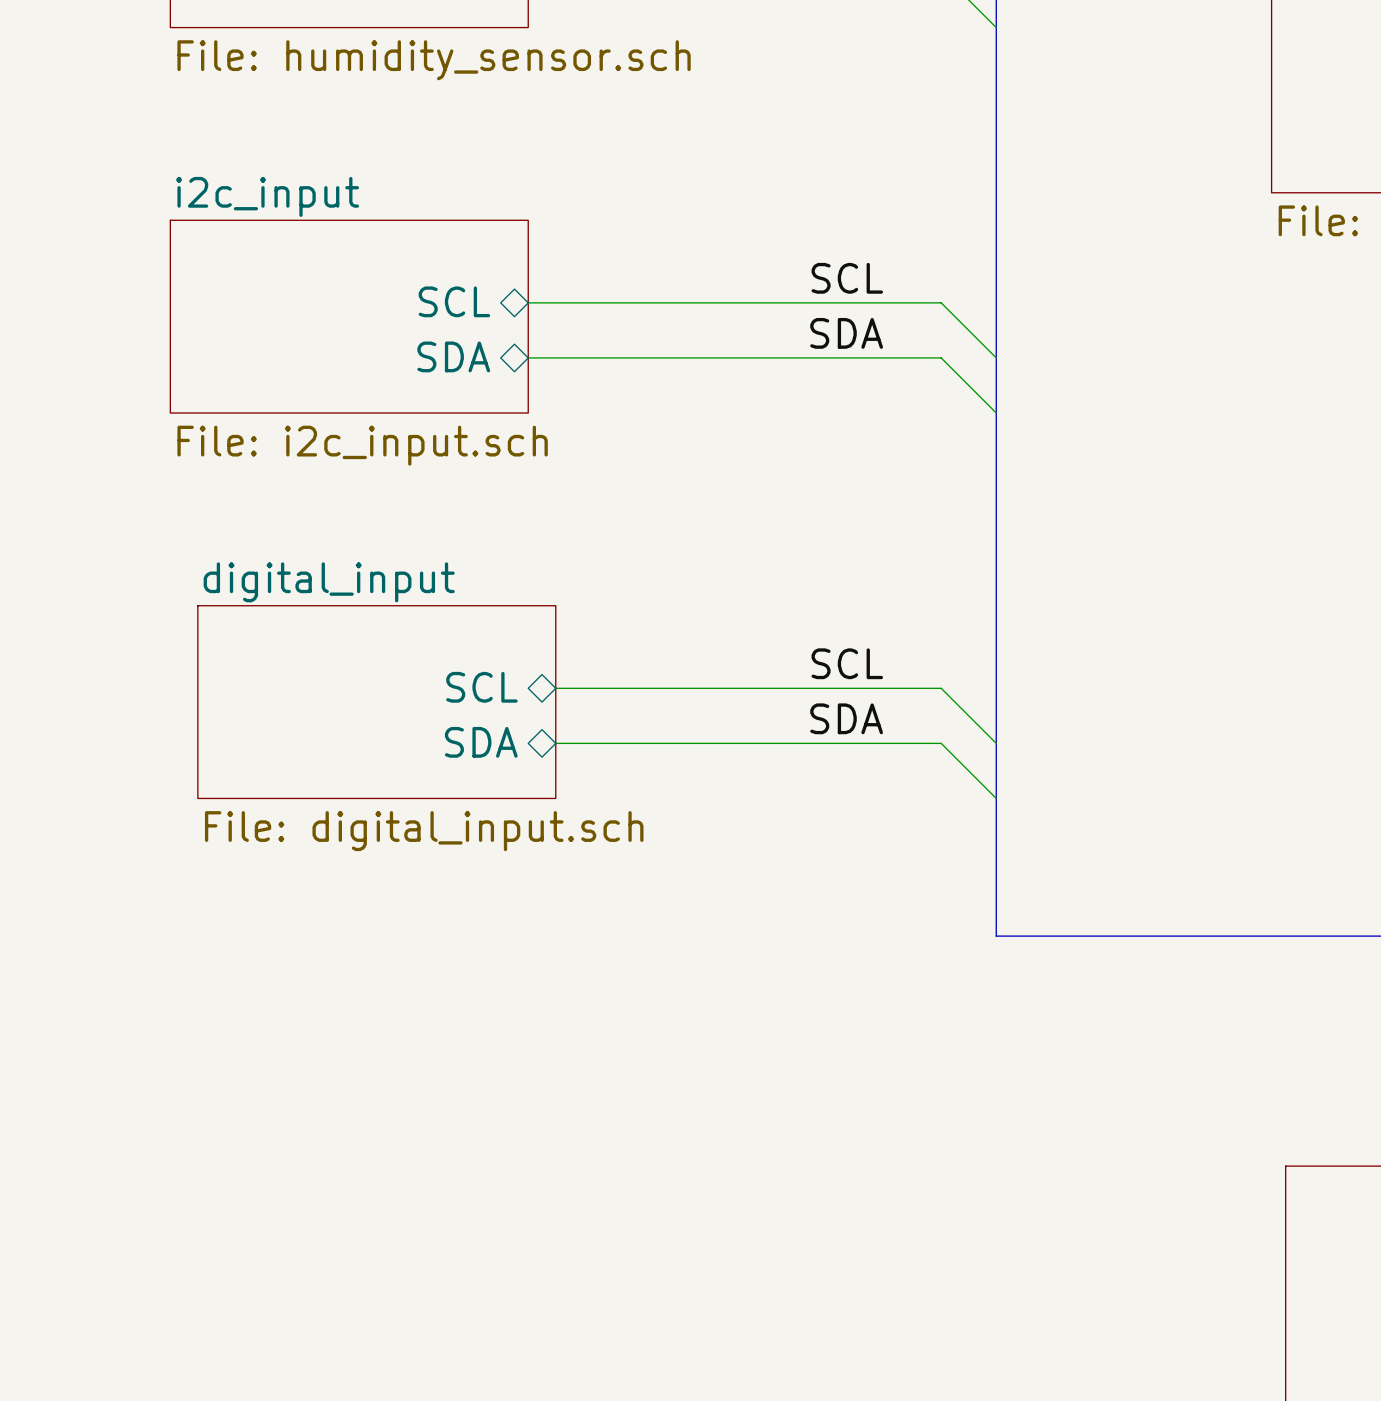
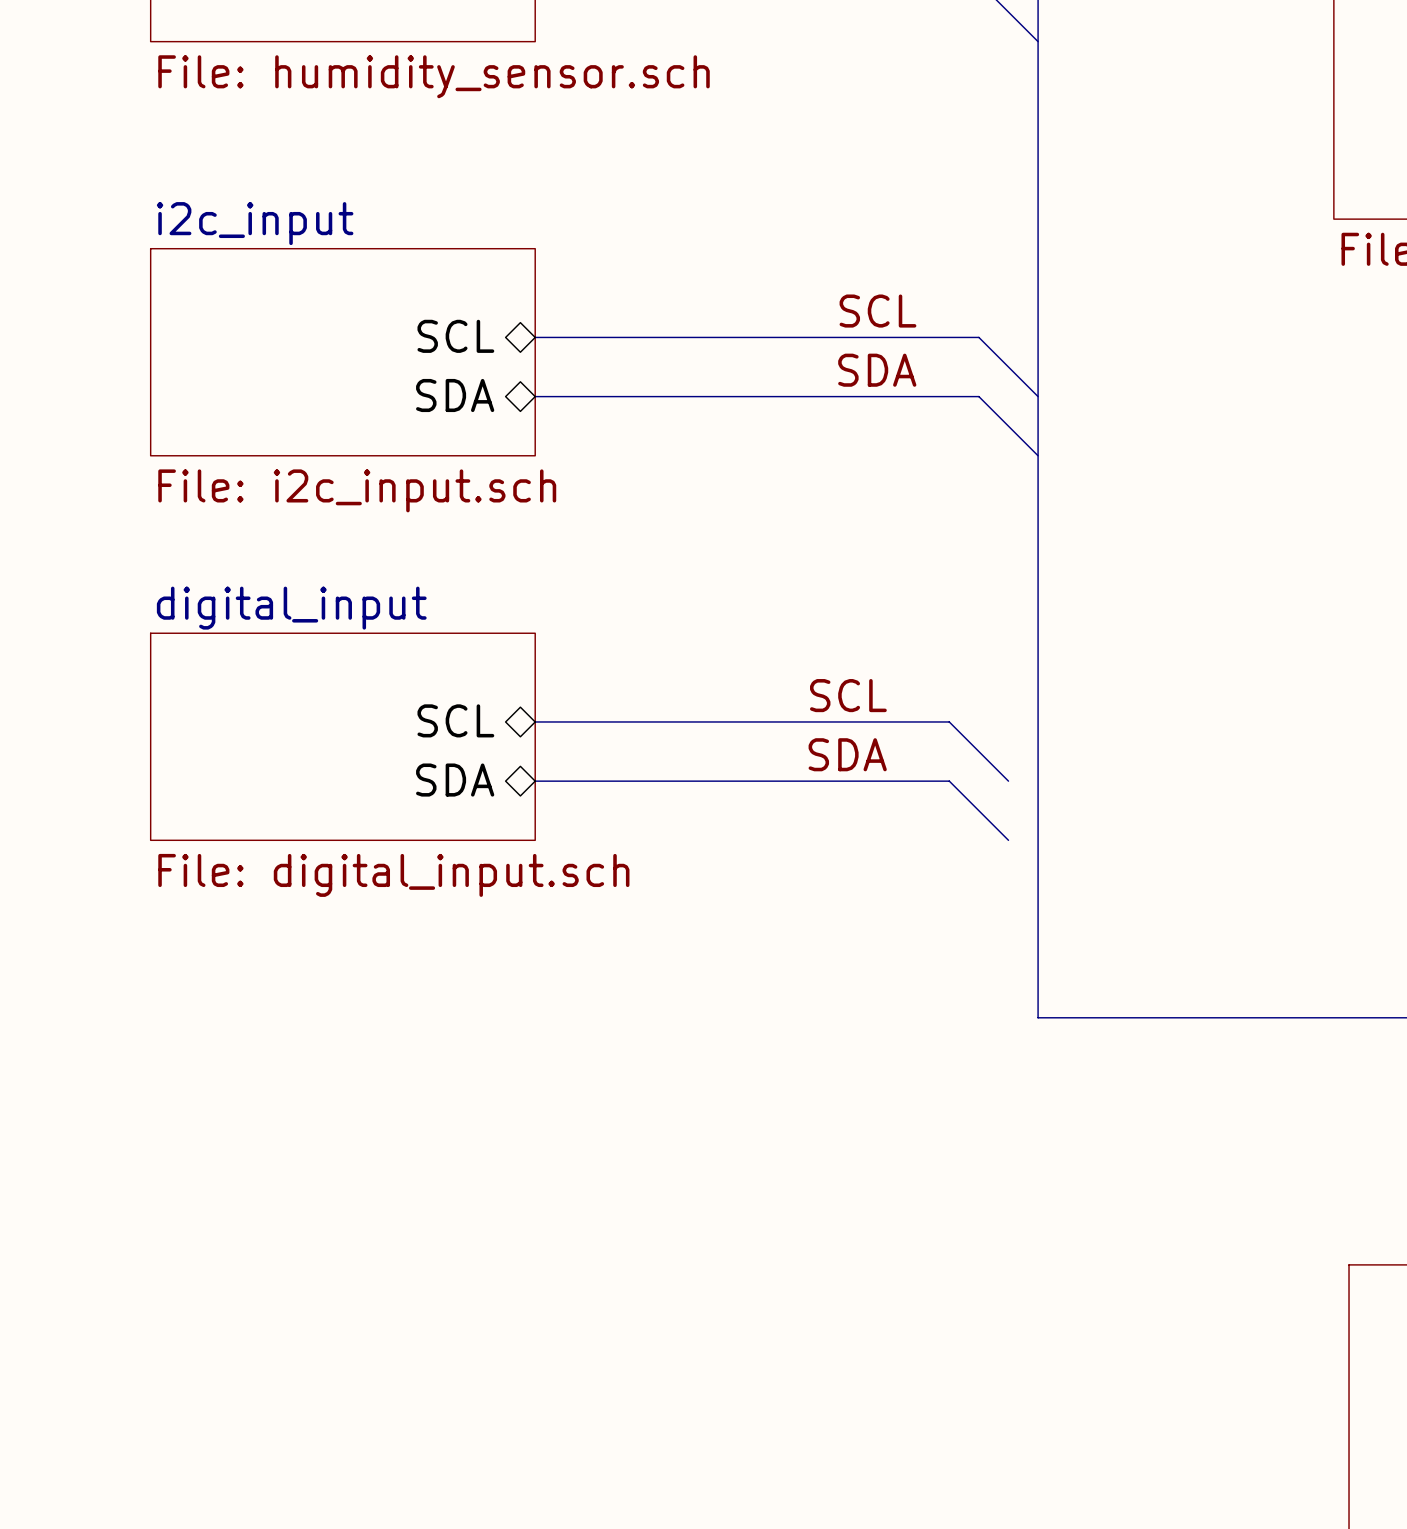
label position: SCL (847, 663) -> SCL (848, 695)
sheet pin position: SCL (481, 687) -> SCL (455, 720)
wire: (555, 688) (941, 688) -> (535, 721) (949, 721) (978, 751)
sheet digital_input position: (376, 702) -> (342, 736)
wire: (968, 715) (996, 743) -> none
label position: SDA (846, 718) -> SDA (847, 754)
sheet pin position: SDA (481, 742) -> SDA (455, 780)
wire: (555, 743) (941, 743) -> (535, 781) (949, 781) (978, 810)
wire: (968, 770) (996, 798) -> none

